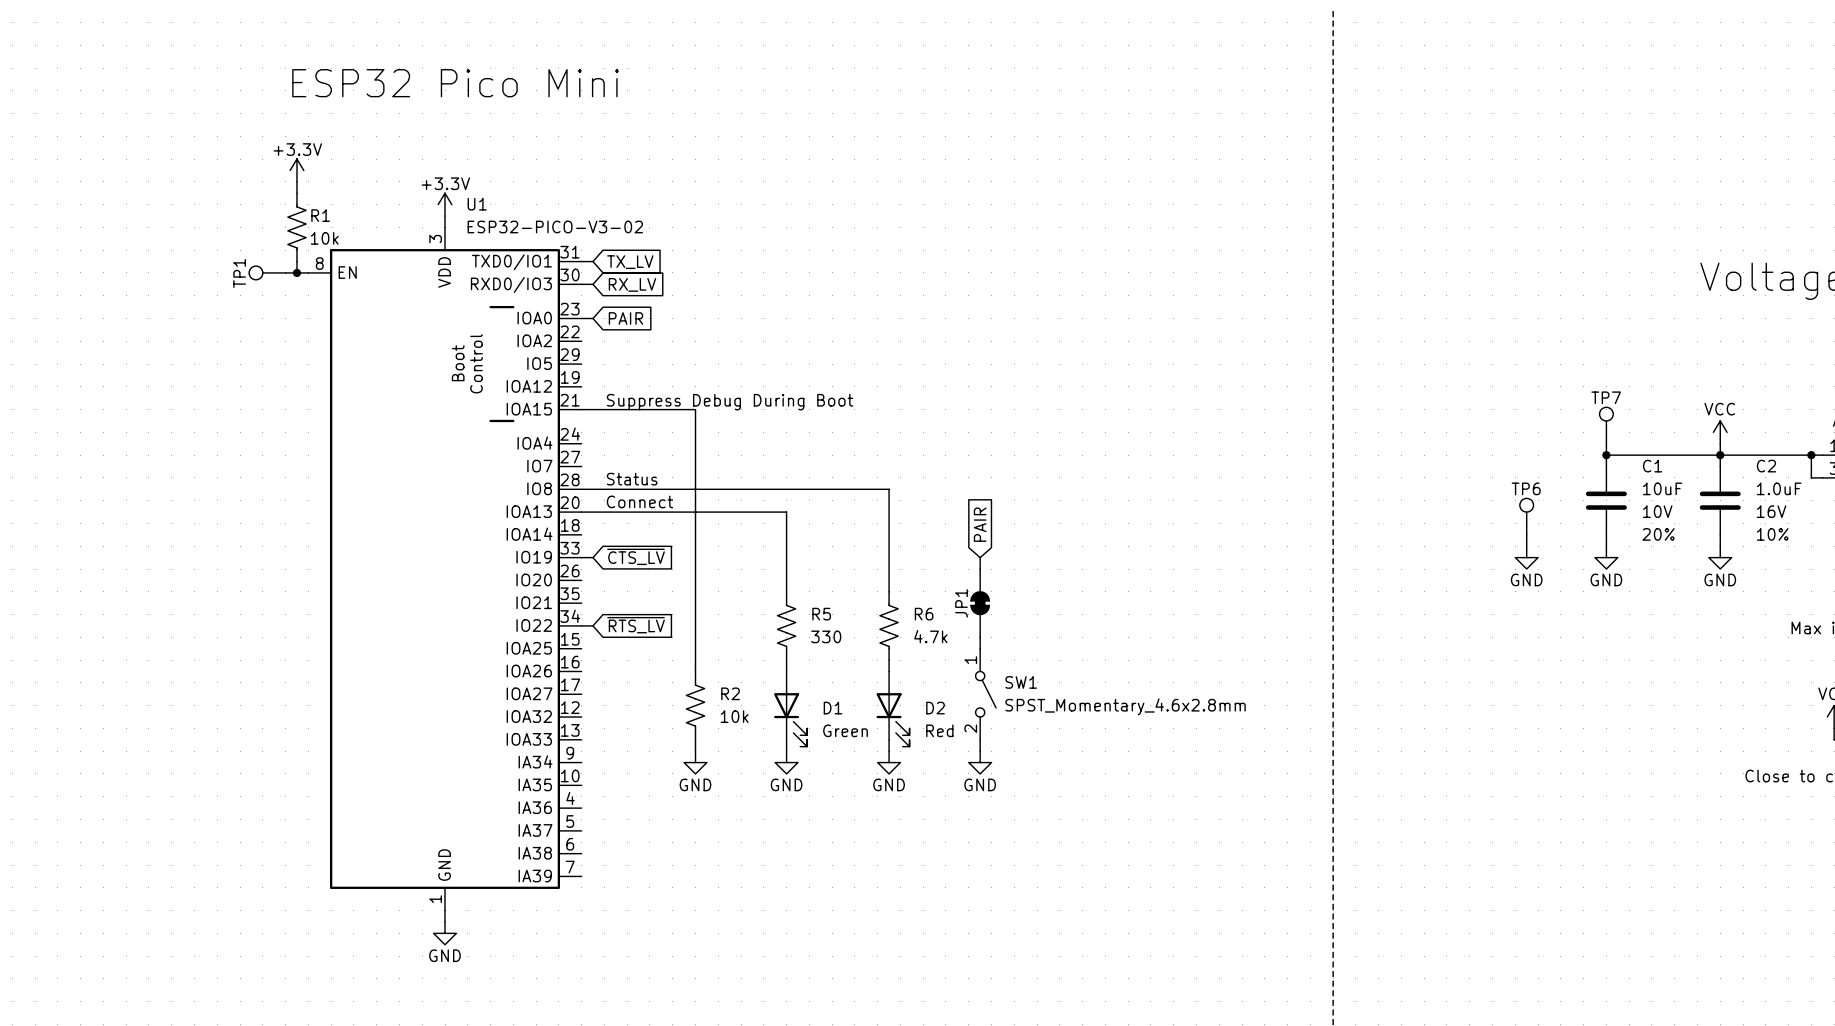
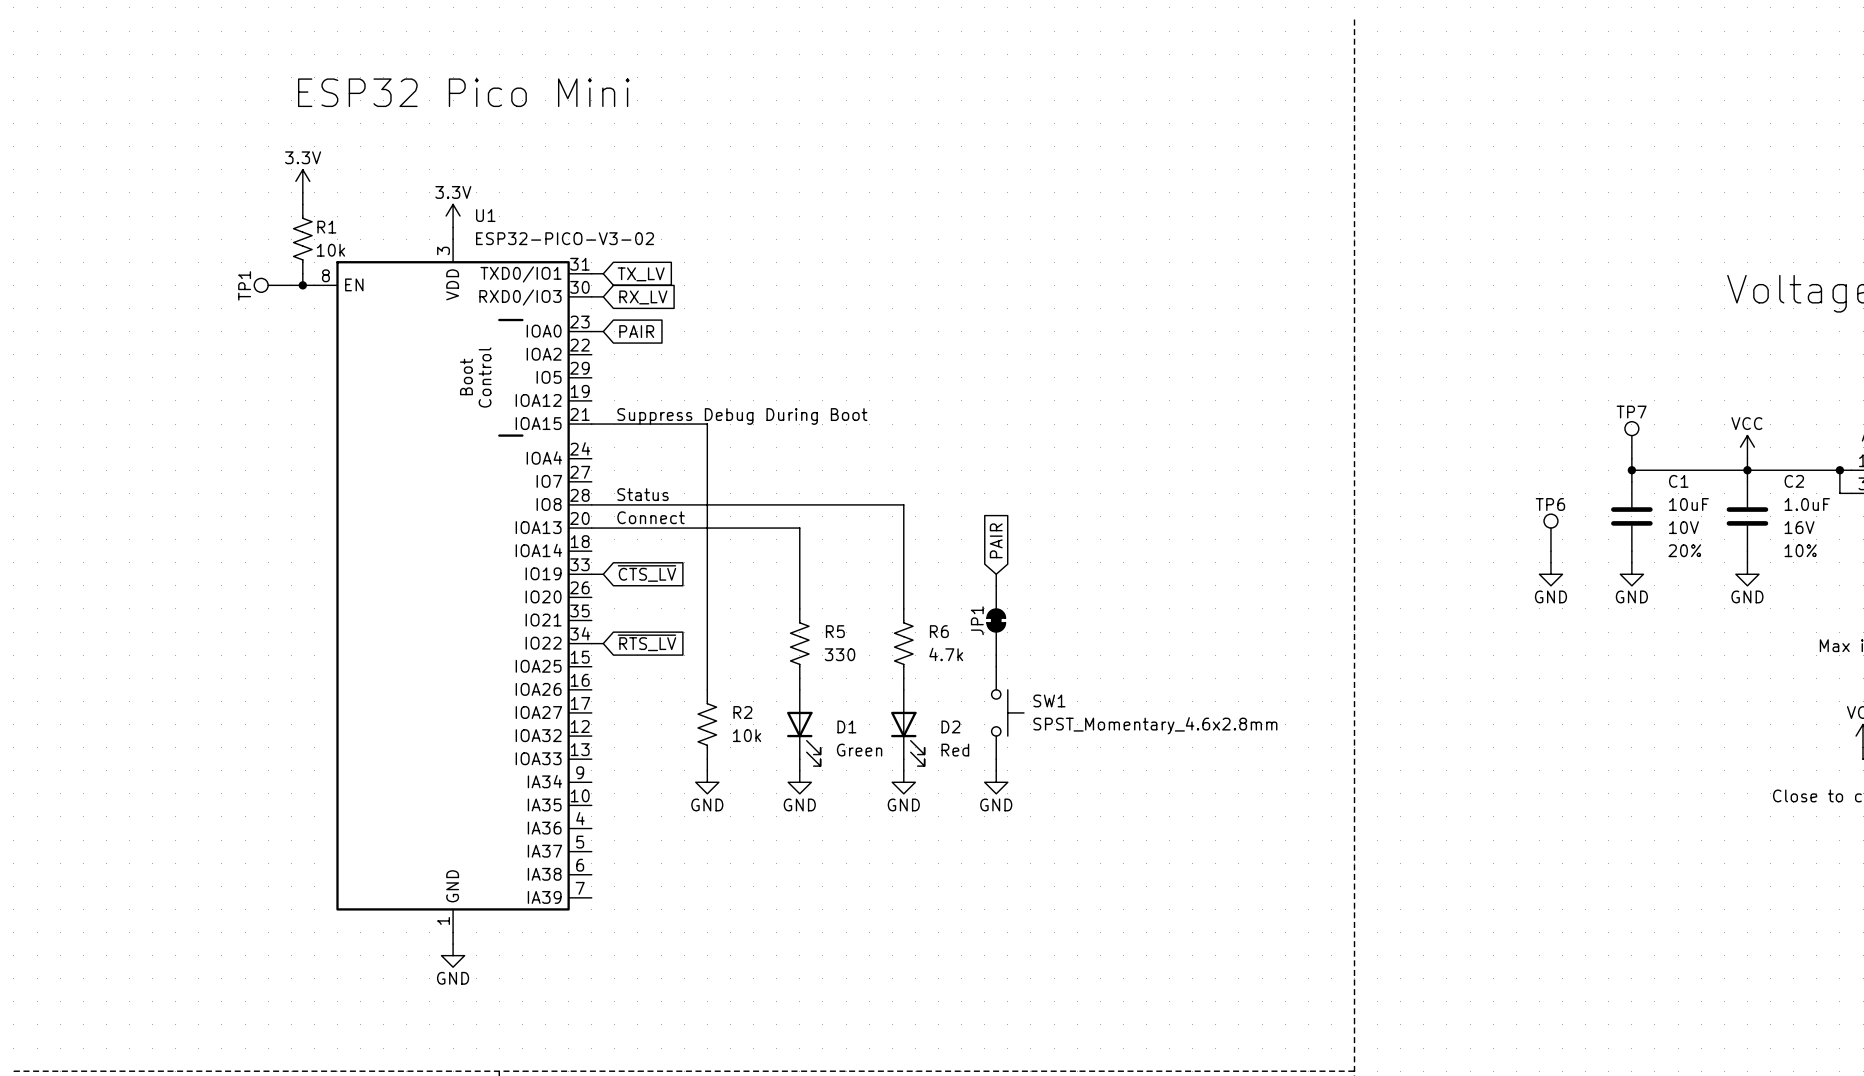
power symbol: +3.3V (296, 170) -> 3.3V (302, 181)
power symbol: +3.3V (445, 204) -> 3.3V (453, 216)
SW1 symbol: [975, 648, 997, 740] -> [991, 666, 1024, 760]

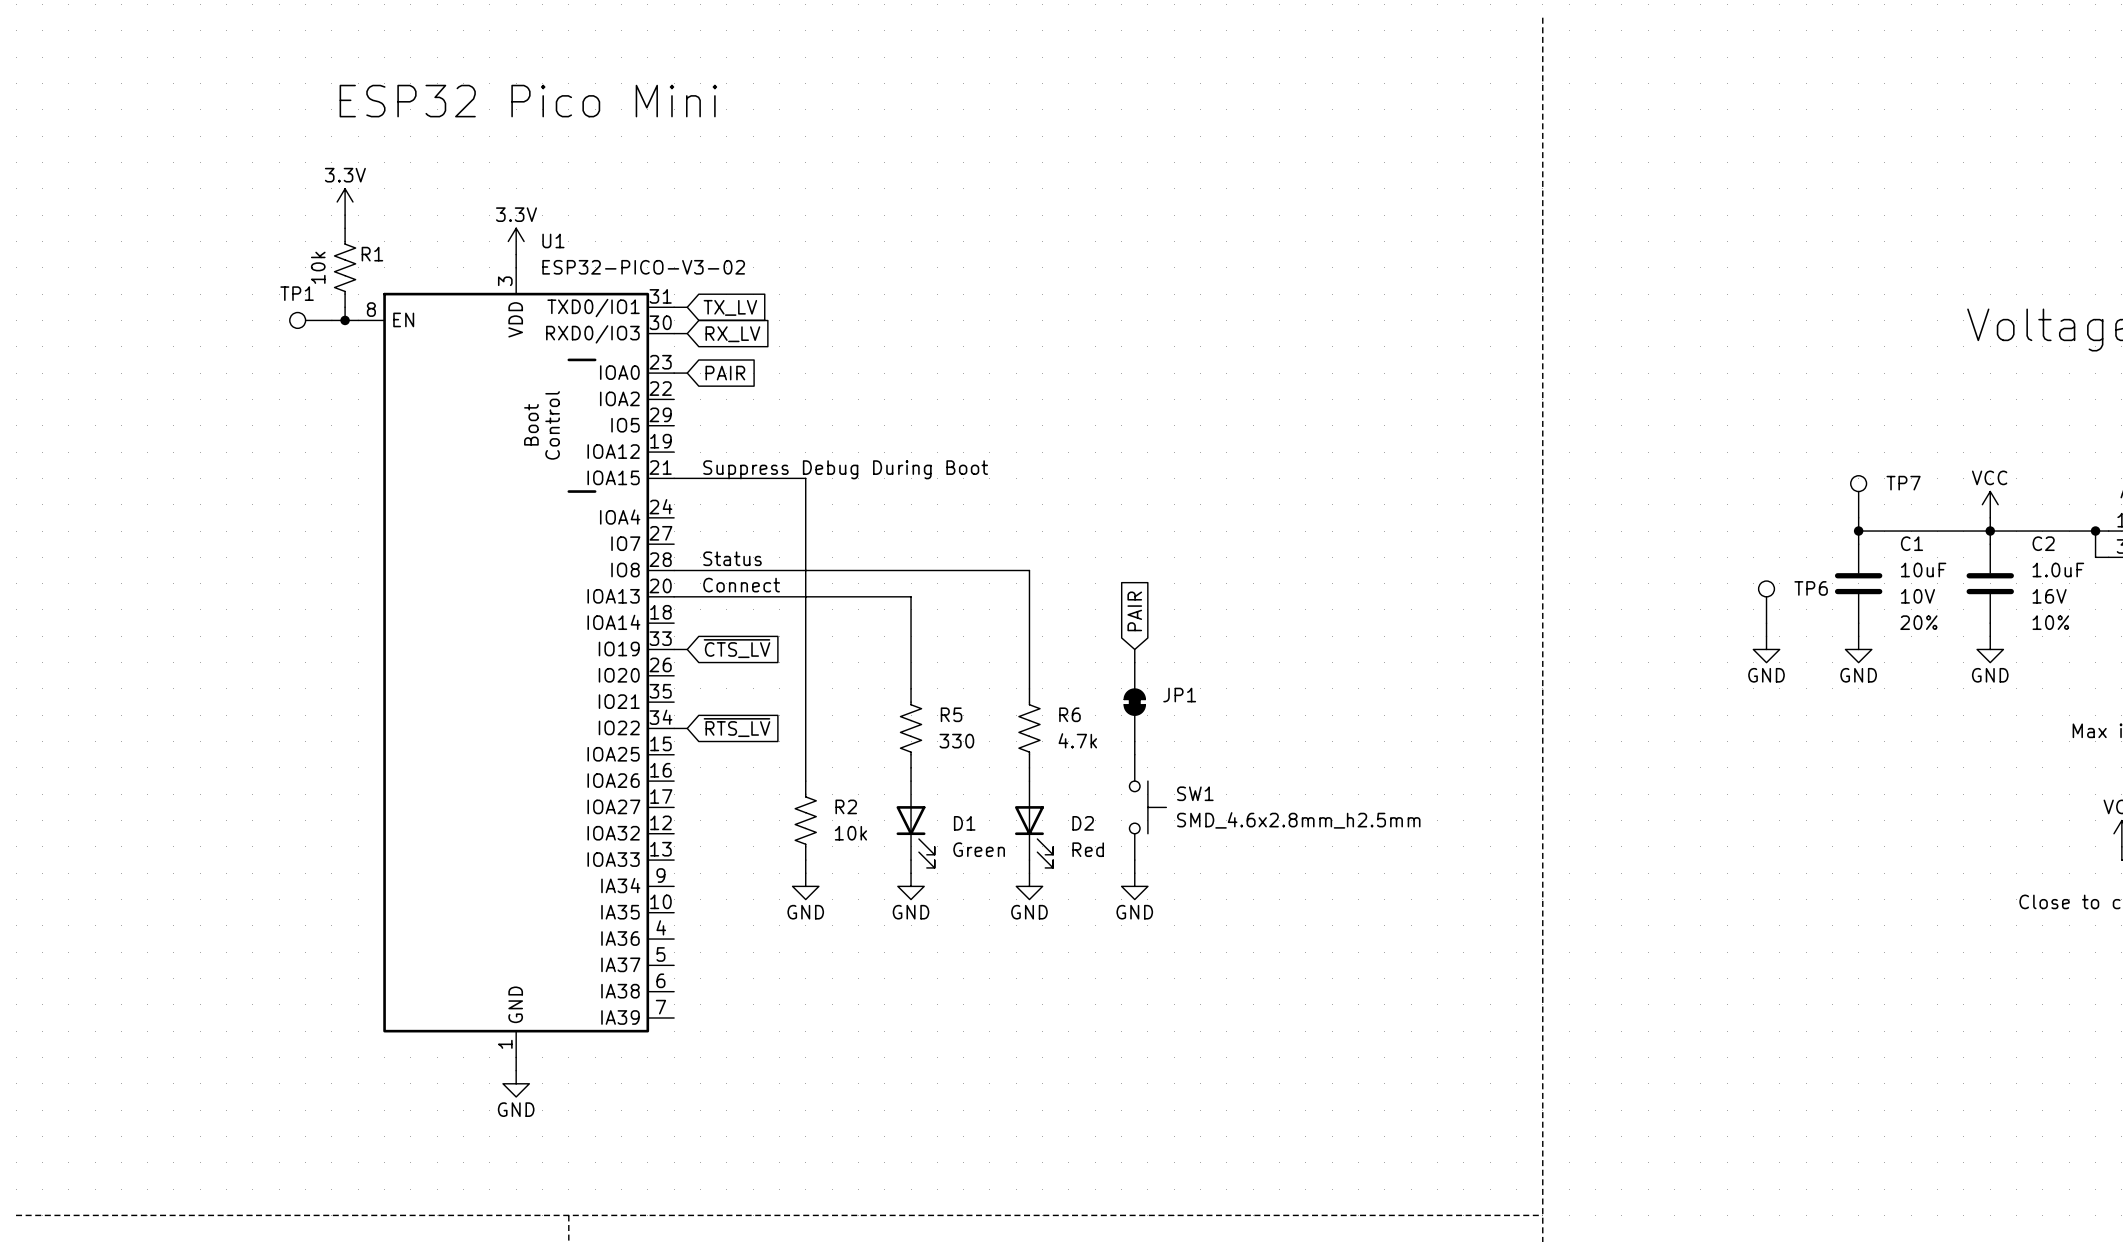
R1 value rotation: 0° (330, 250) -> 90° counterclockwise (318, 267)
R1 value position: 10k (330, 250) -> 10k (318, 267)
TP1 name rotation: 0° (244, 285) -> 90° clockwise (297, 293)
TP7 name position: TP7 (1631, 412) -> TP7 (1903, 483)
TP6 name position: TP6 (1550, 504) -> TP6 (1811, 588)
JP1 name rotation: 0° (977, 620) -> 90° clockwise (1179, 695)
JP1 name position: JP1 (977, 620) -> JP1 (1179, 695)
SW1 value: SPST_Momentary_4.6x2.8mm (1155, 725) -> SMD_4.6x2.8mm_h2.5mm (1298, 820)

